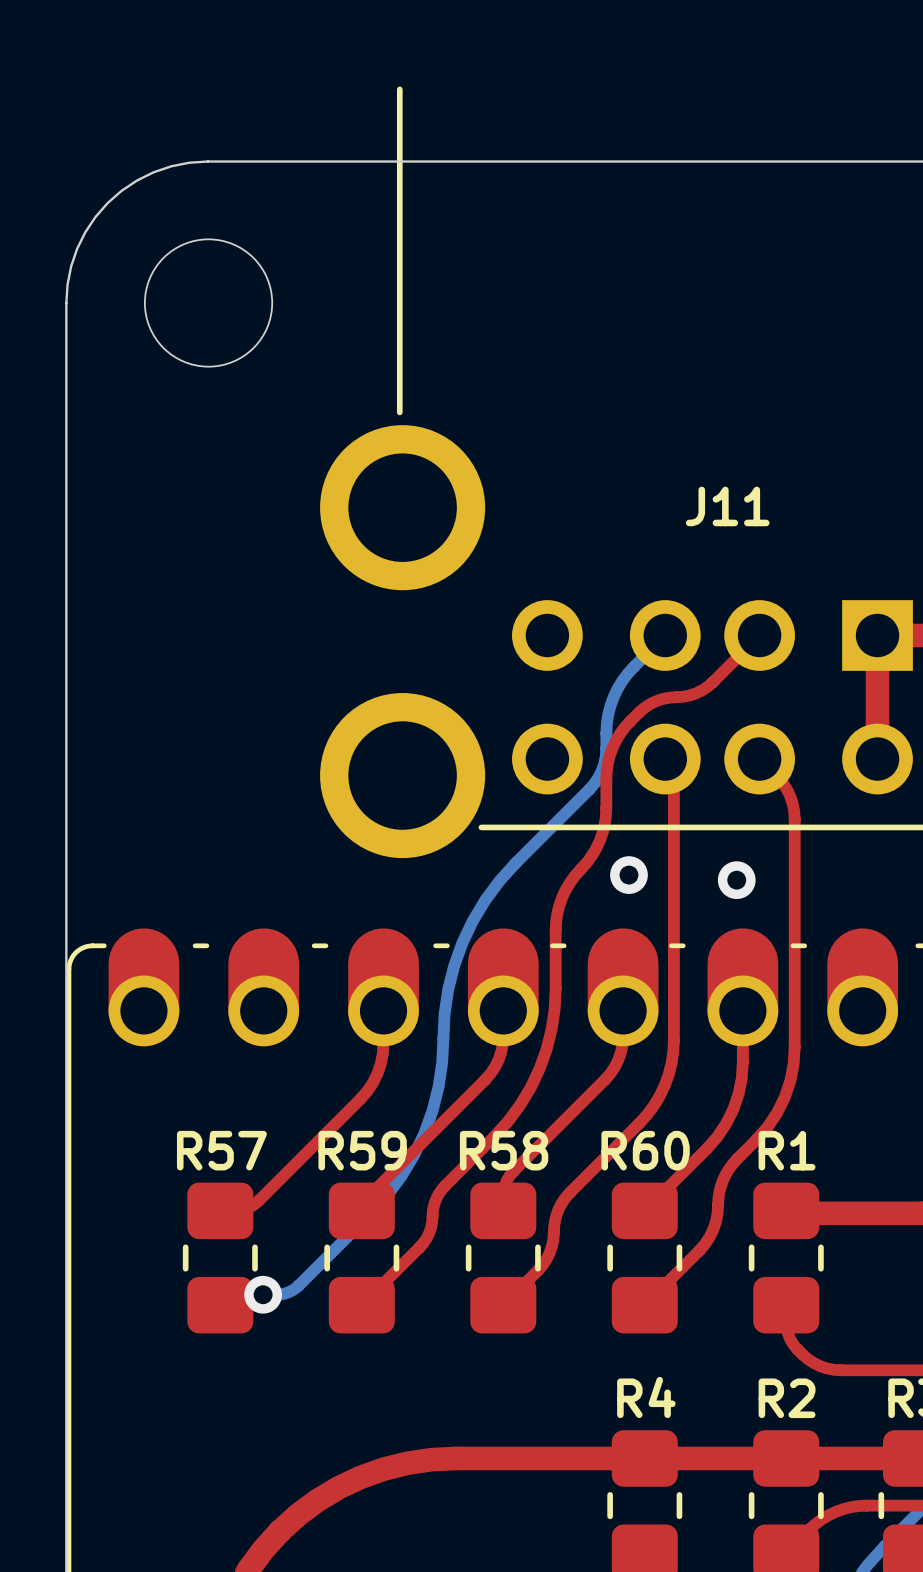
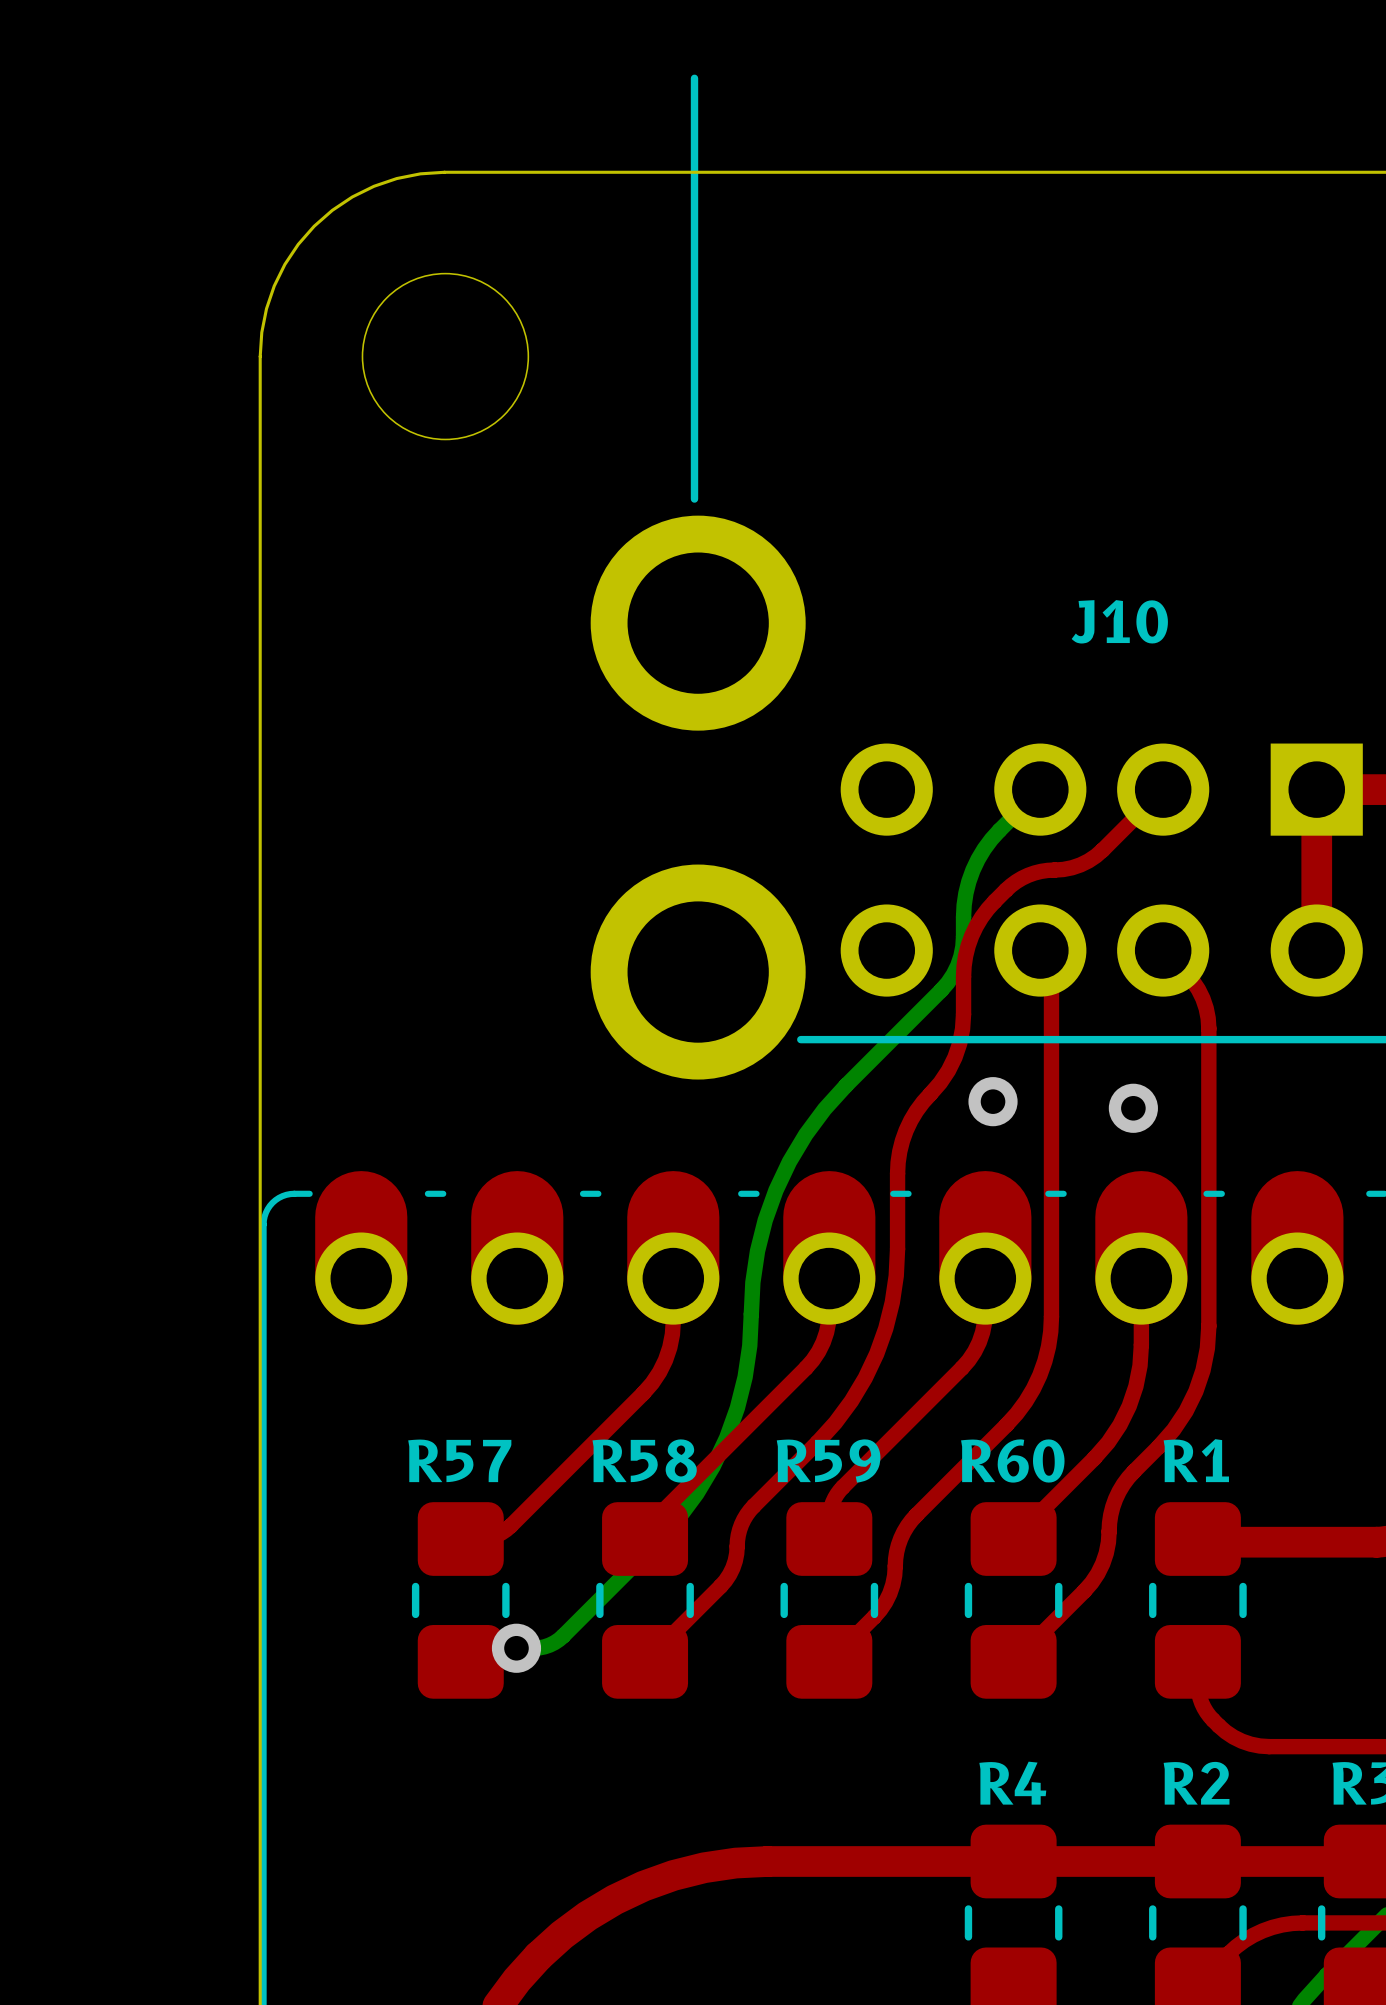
J11 name: J11 (727, 506) -> J10 (1119, 621)
R59 name: R59 (362, 1150) -> R58 (644, 1461)
R58 name: R58 (504, 1150) -> R59 (828, 1461)

